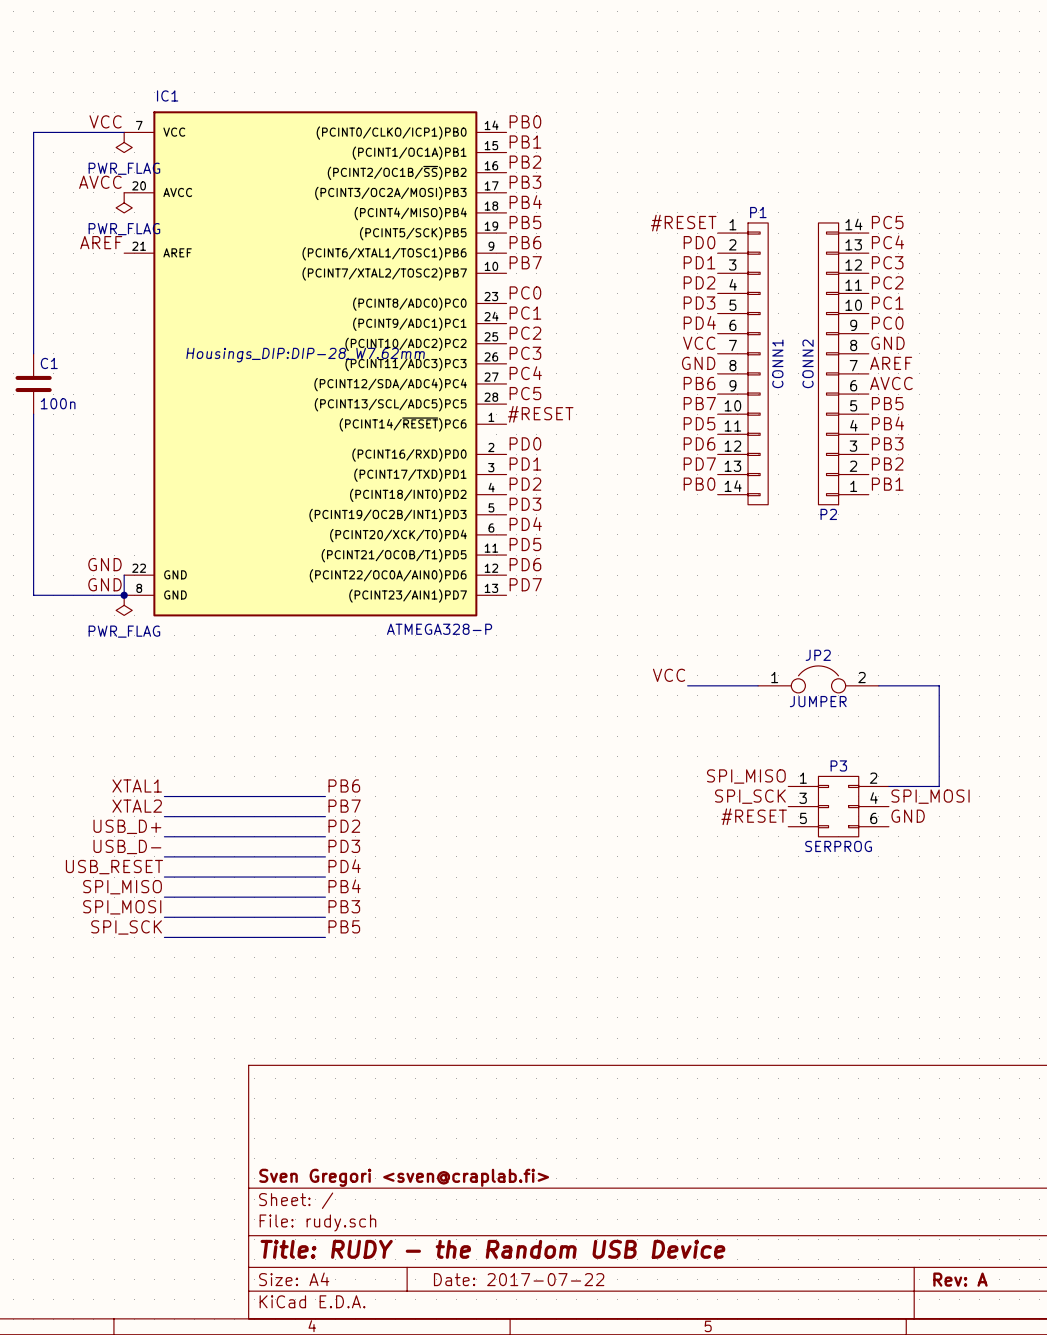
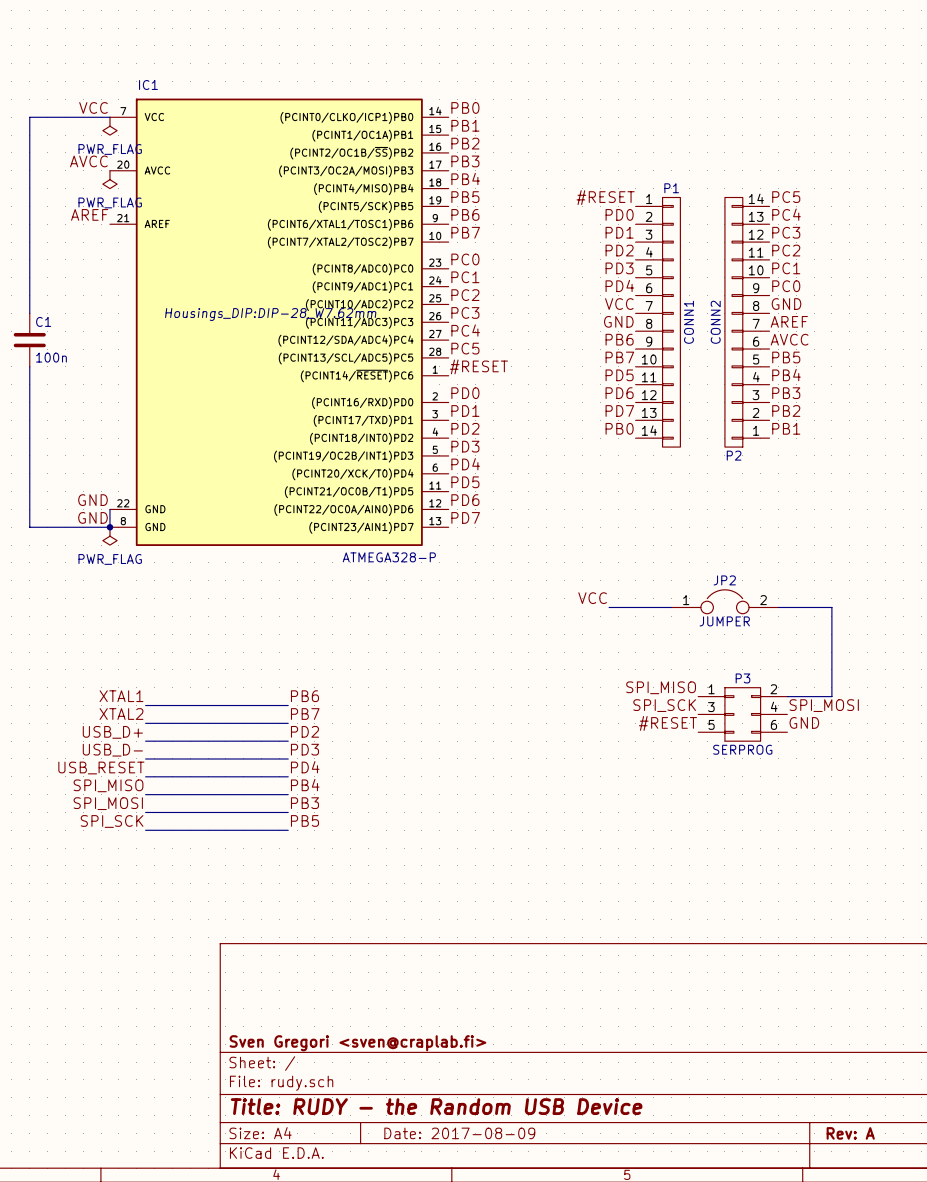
title block: Date: 2017-07-22 (519, 1279) -> Date: 2017-08-09 (459, 1133)

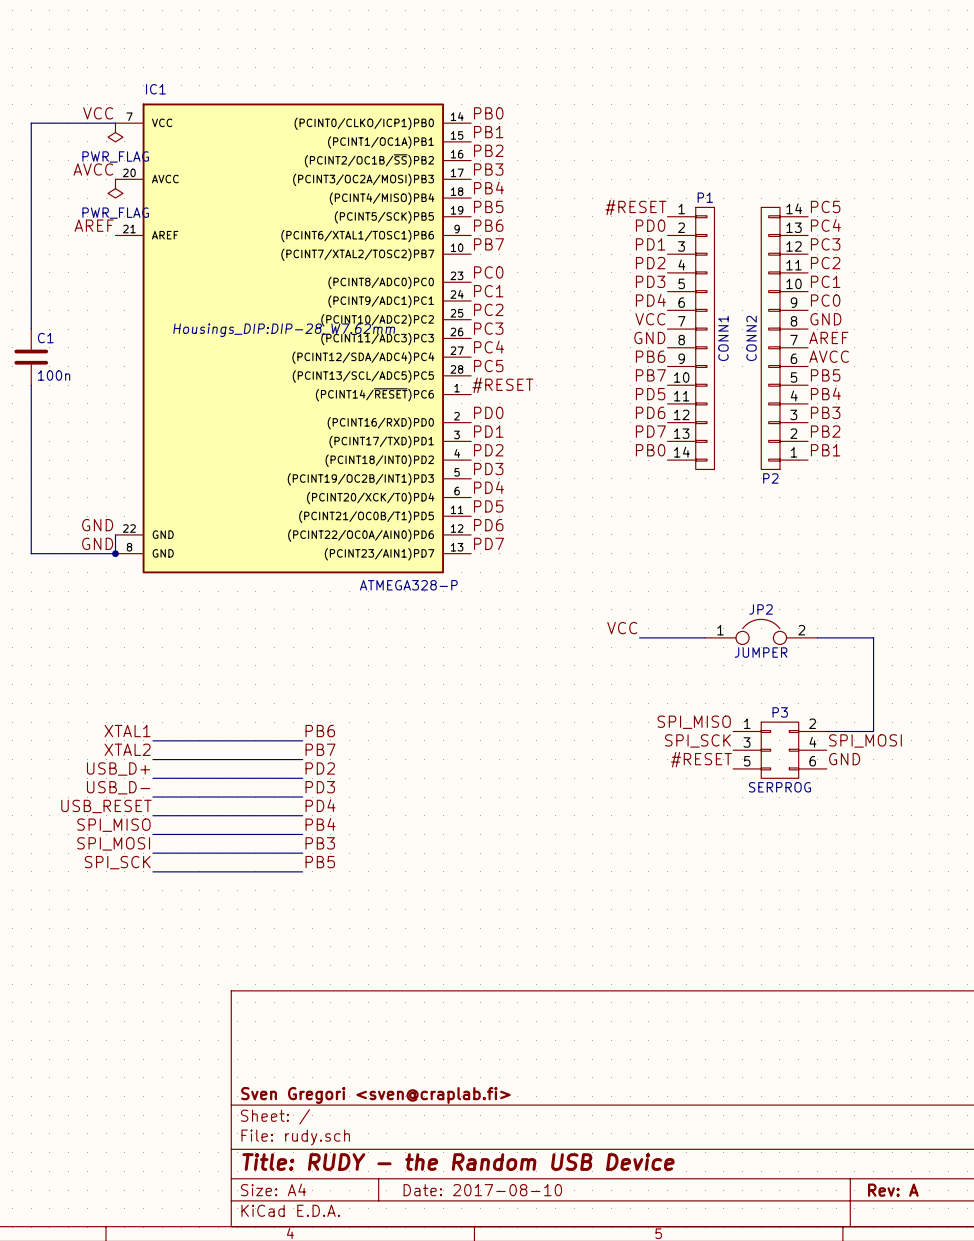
power symbol: PWR_FLAG (109, 536) -> none
title block: Date: 2017-08-09 (459, 1133) -> Date: 2017-08-10 (482, 1190)

